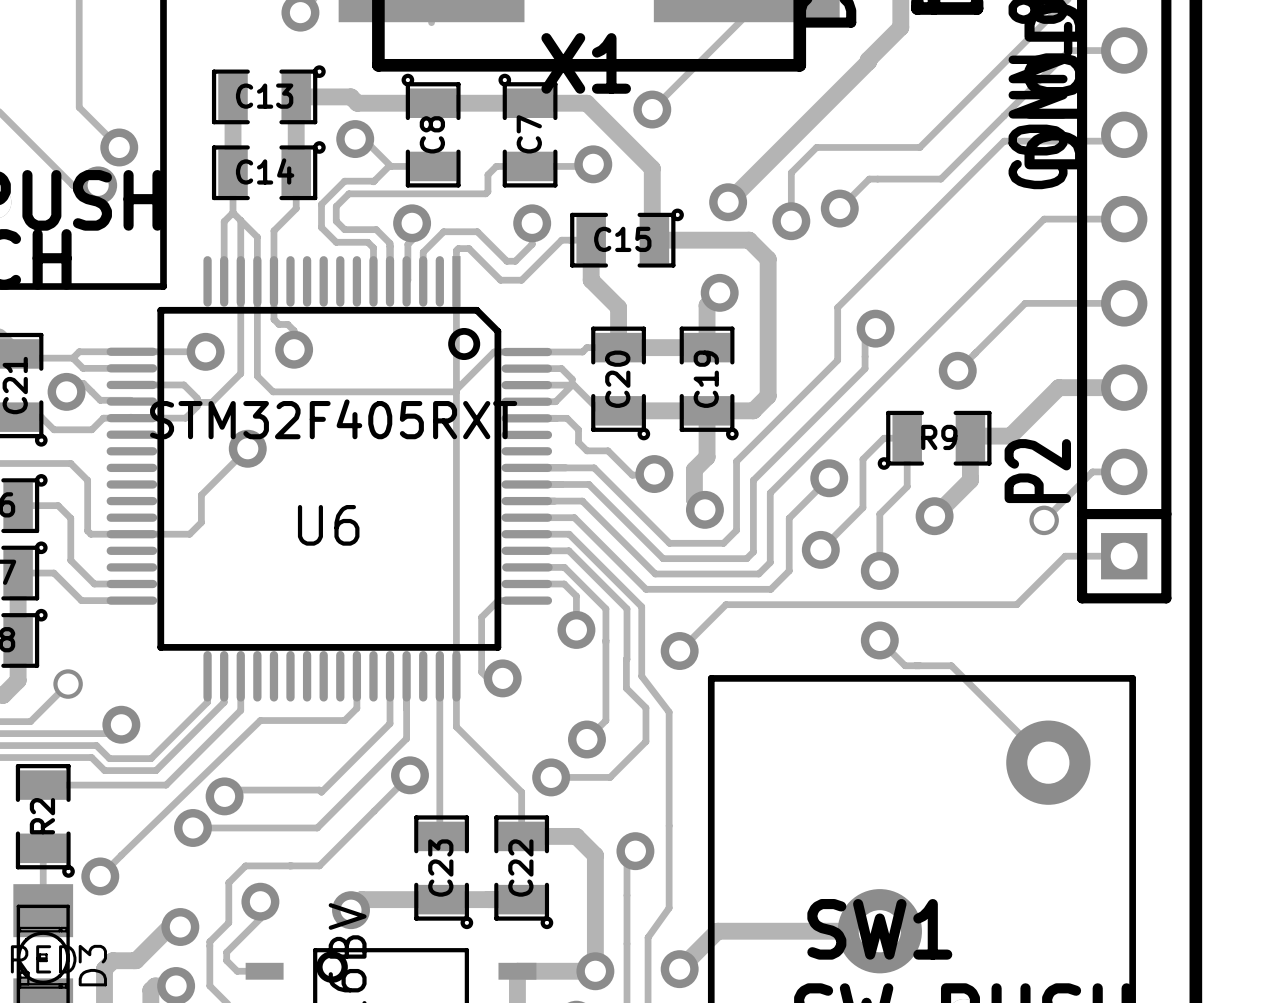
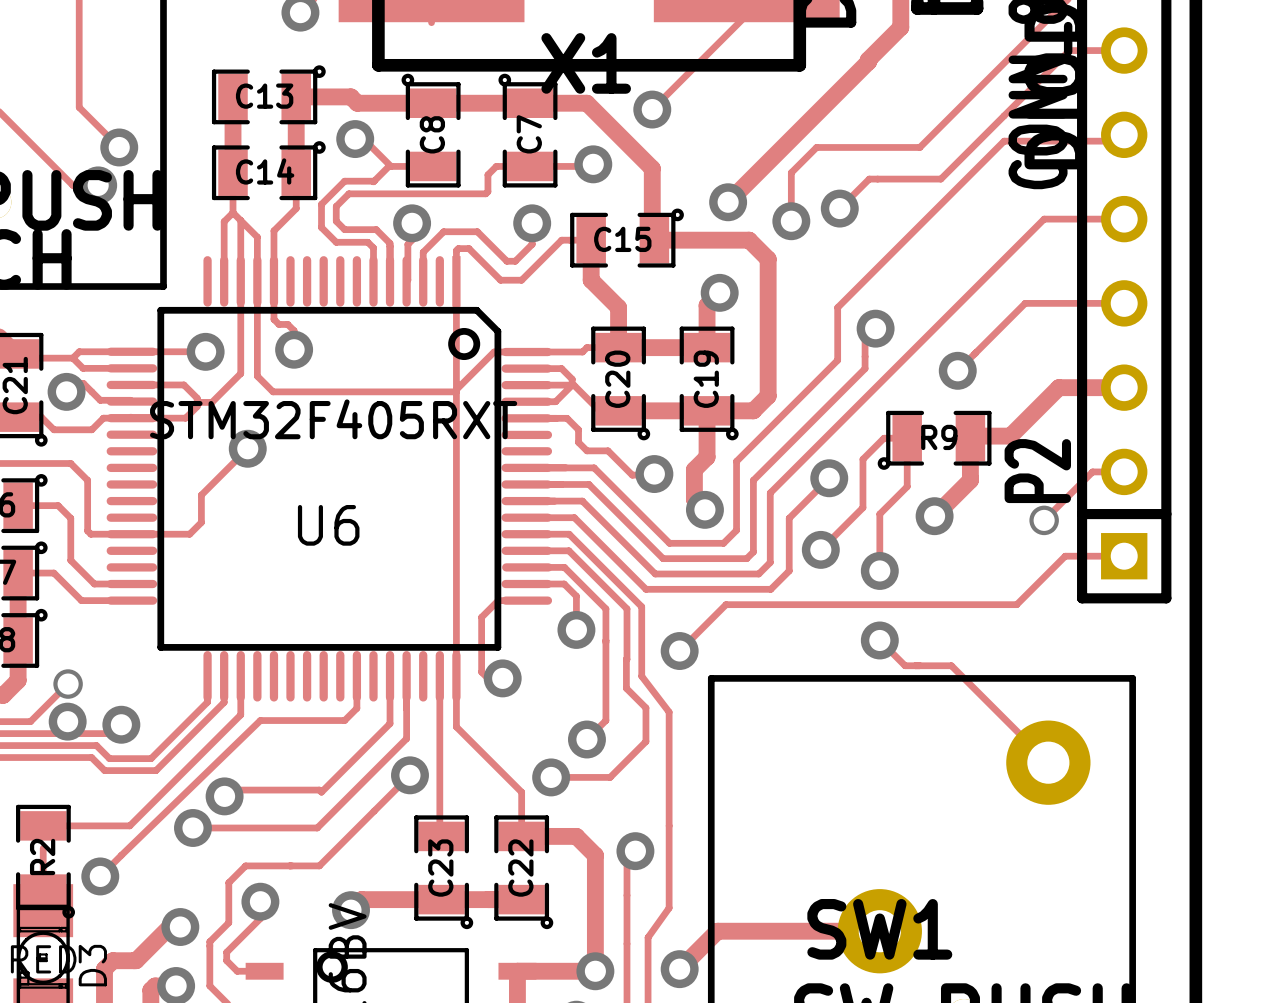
track: (240, 710) (166, 785) (43, 785) -> (240, 710) (240, 714) (129, 825) (43, 825)
via: none -> (67, 721)
R2 position: (45, 820) -> (45, 861)

